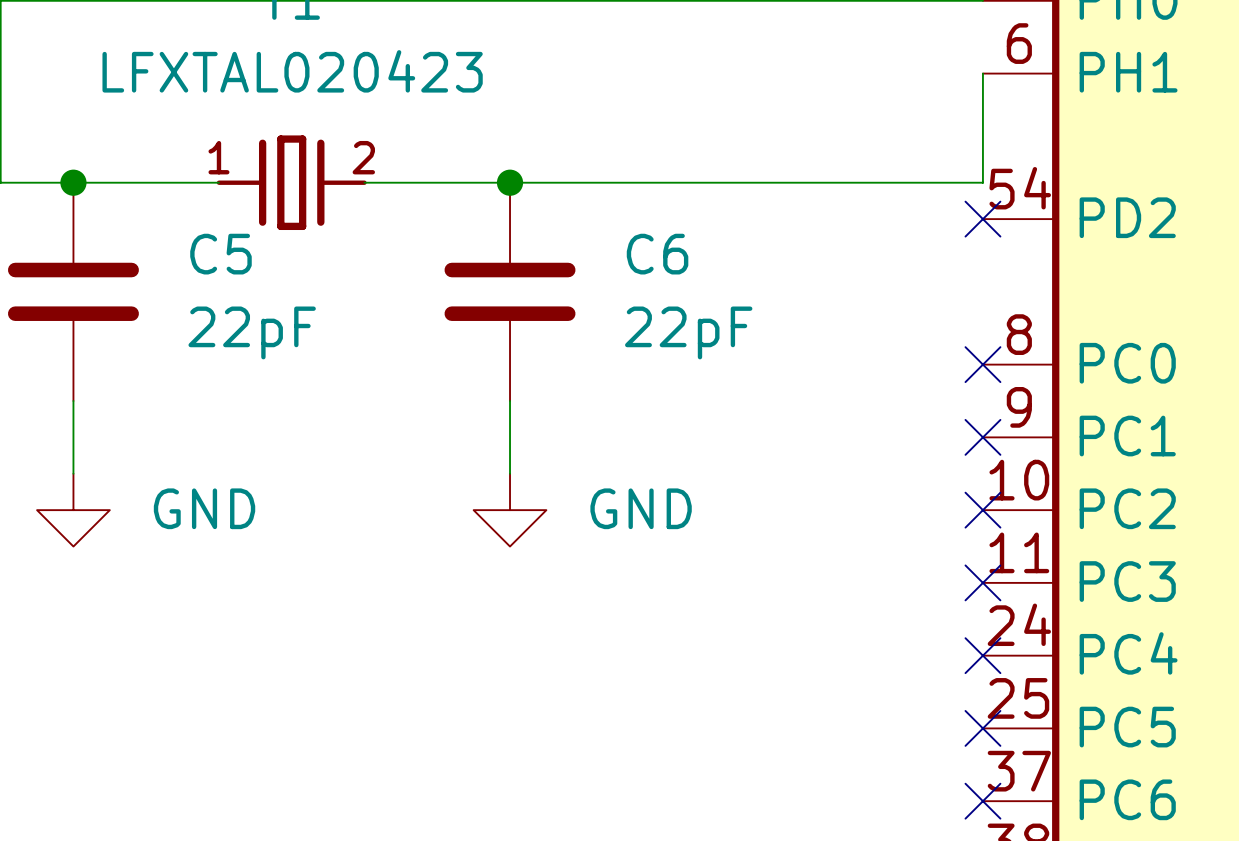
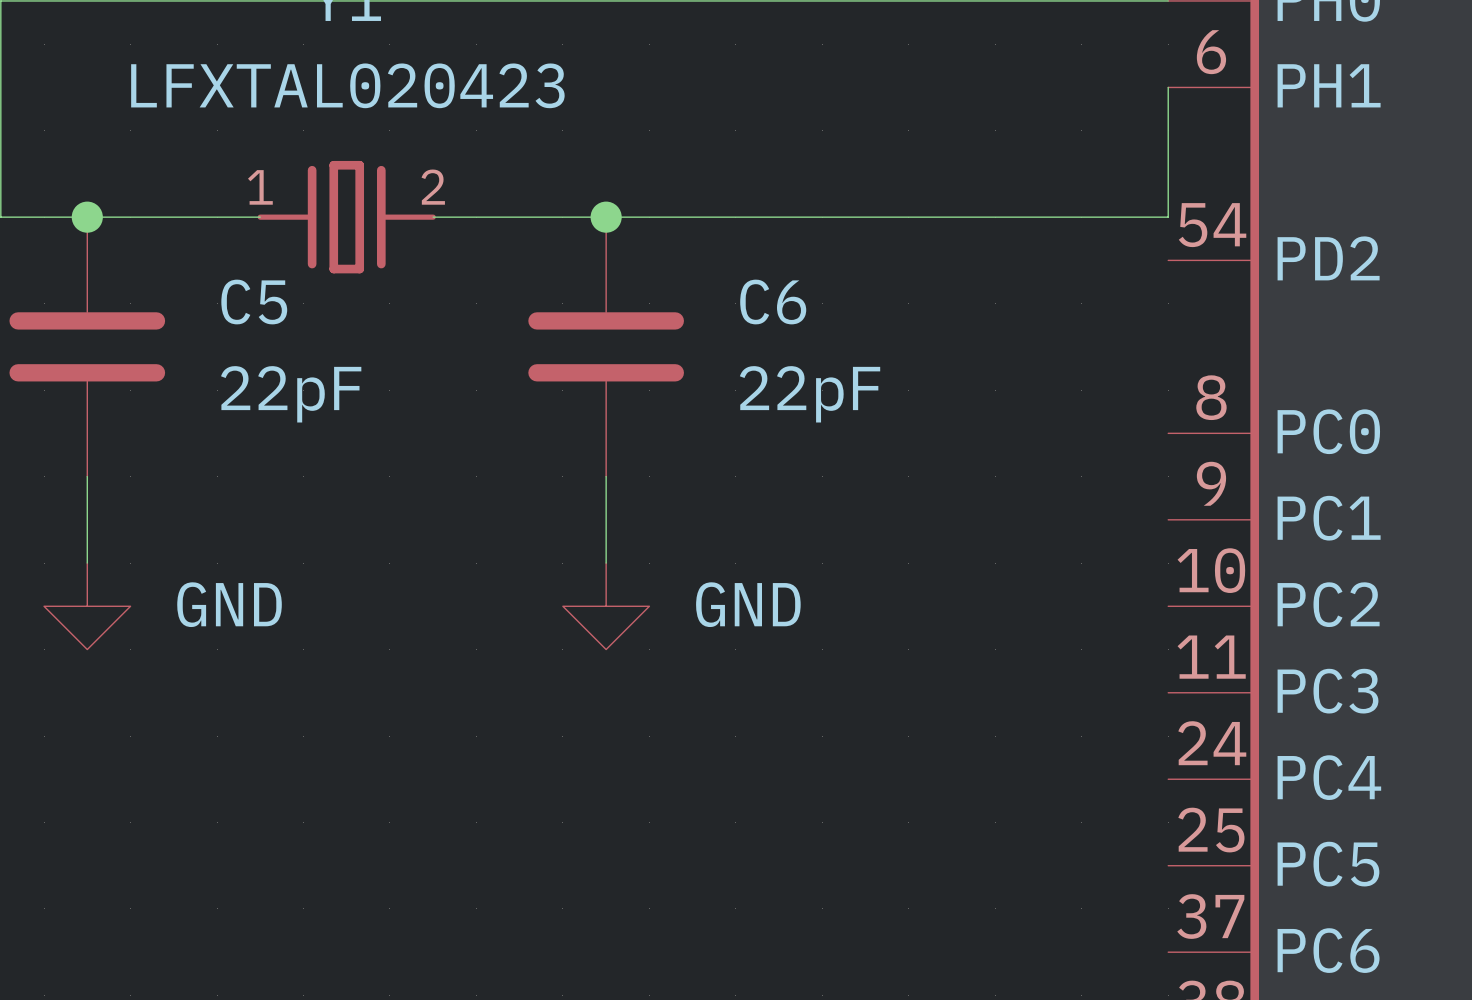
no-connect mark: (982, 219) -> none
no-connect mark: (982, 364) -> none
no-connect mark: (982, 437) -> none
no-connect mark: (982, 510) -> none
no-connect mark: (982, 582) -> none
no-connect mark: (982, 655) -> none
no-connect mark: (982, 728) -> none
no-connect mark: (982, 801) -> none

